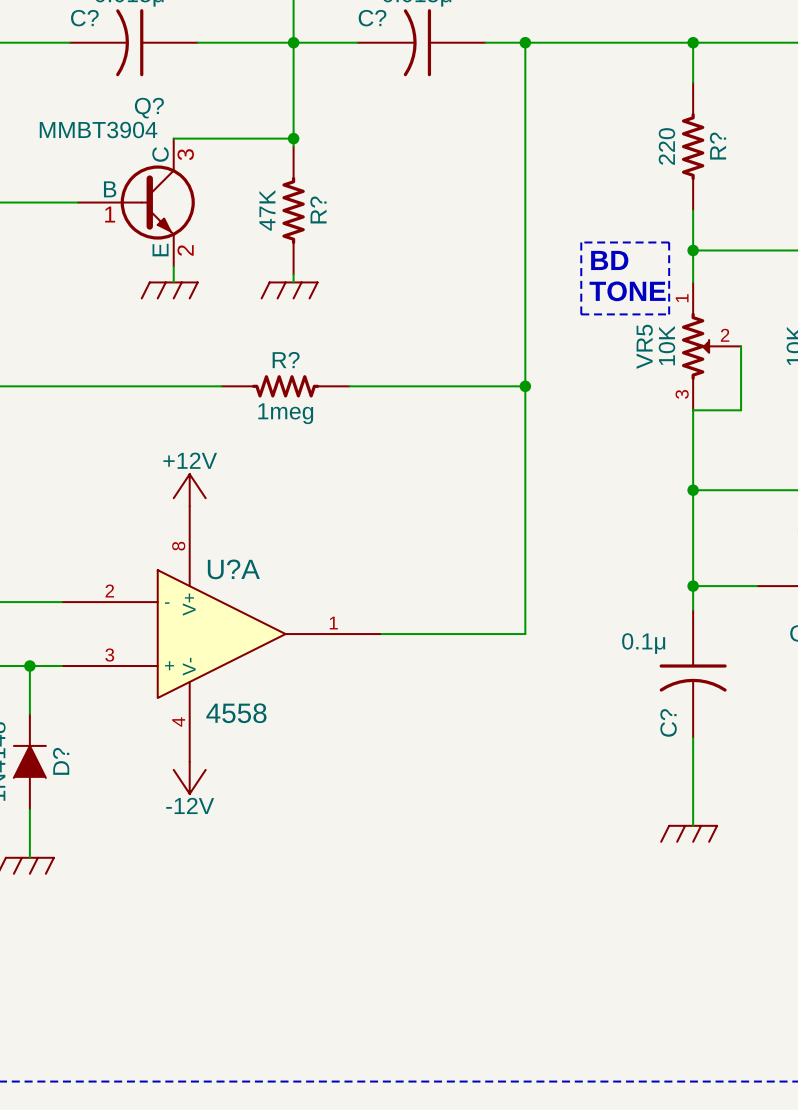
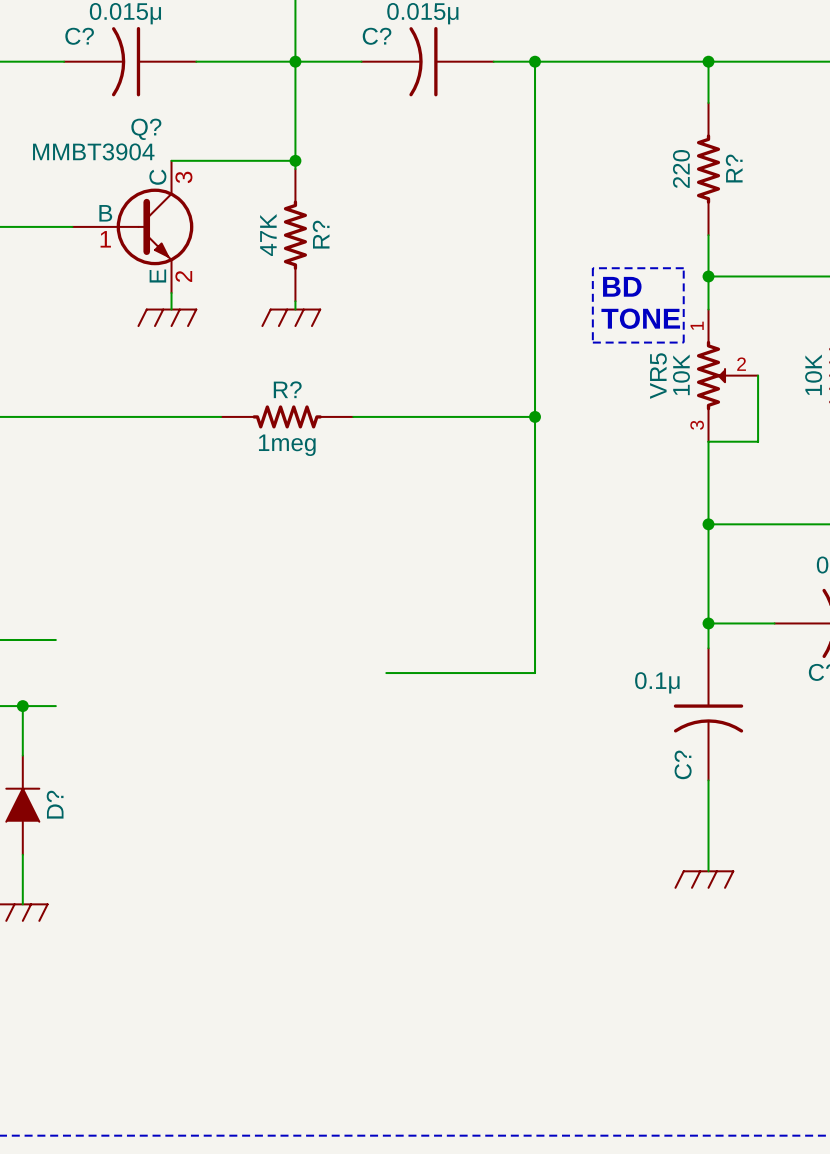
power symbol: +12V (189, 490) -> none
U?A: 4558 (221, 634) -> none
power symbol: -12V (189, 777) -> none

